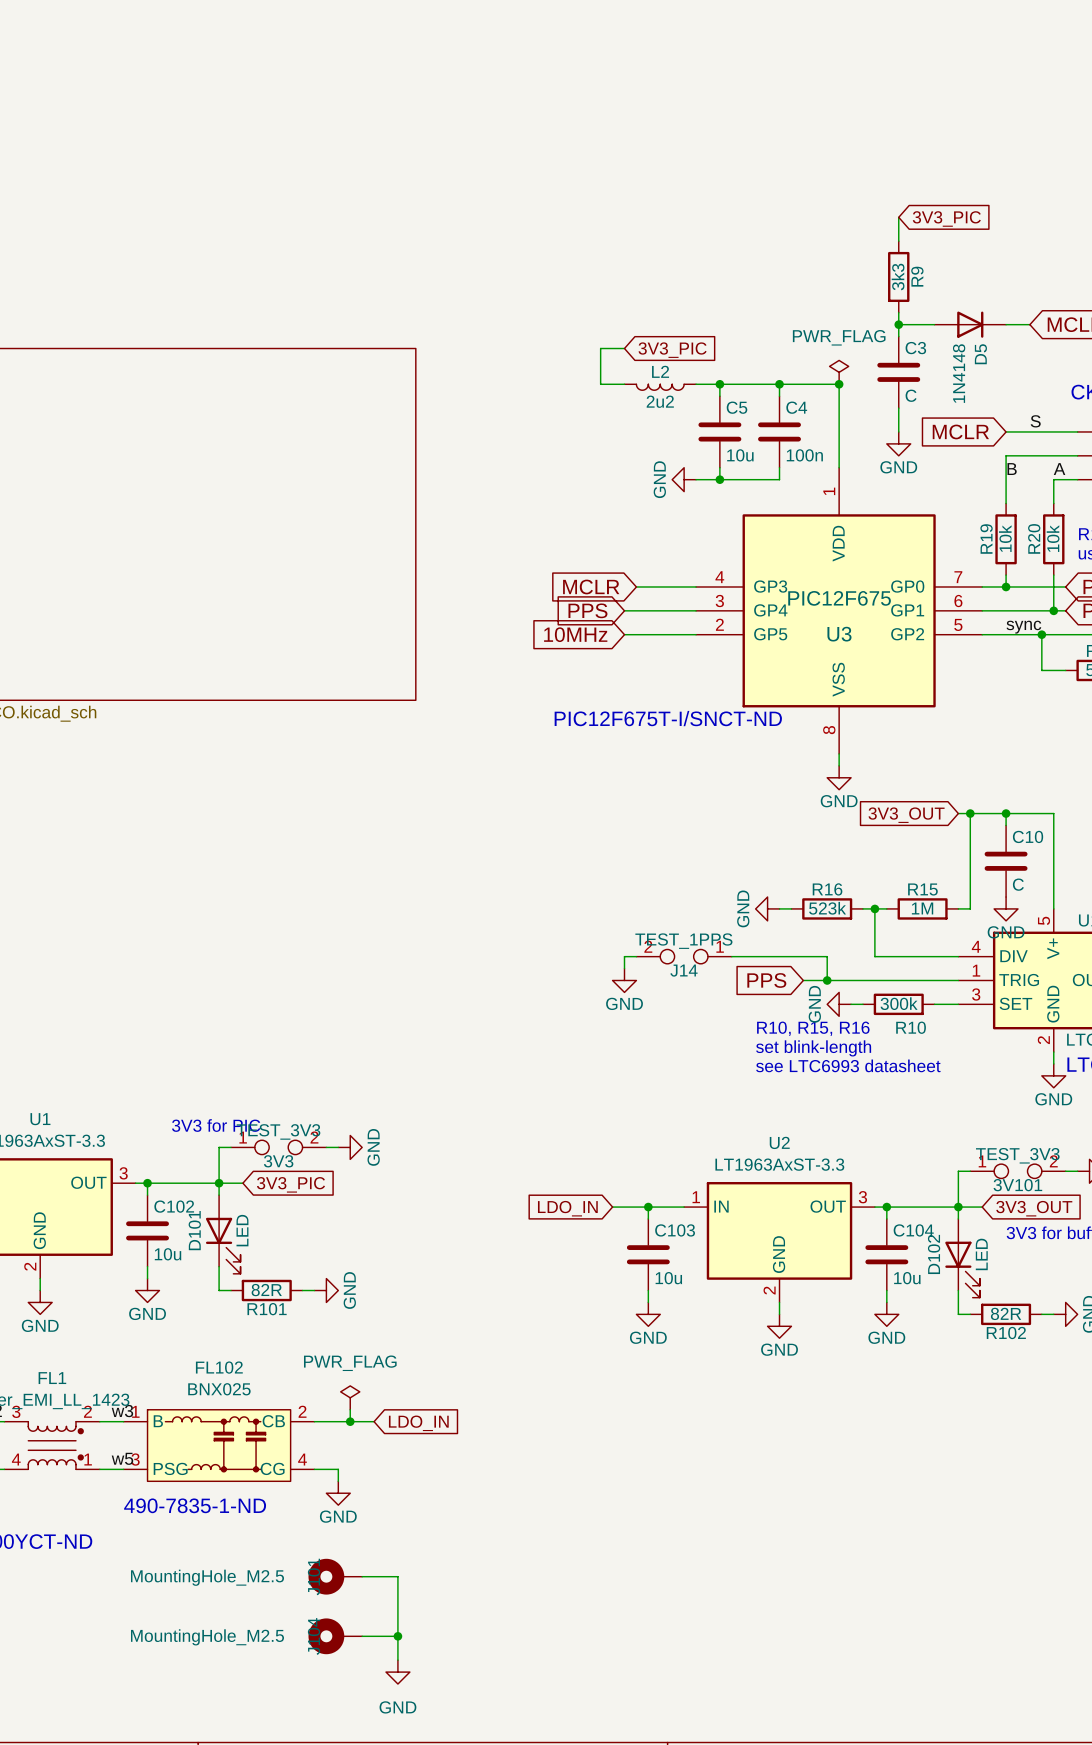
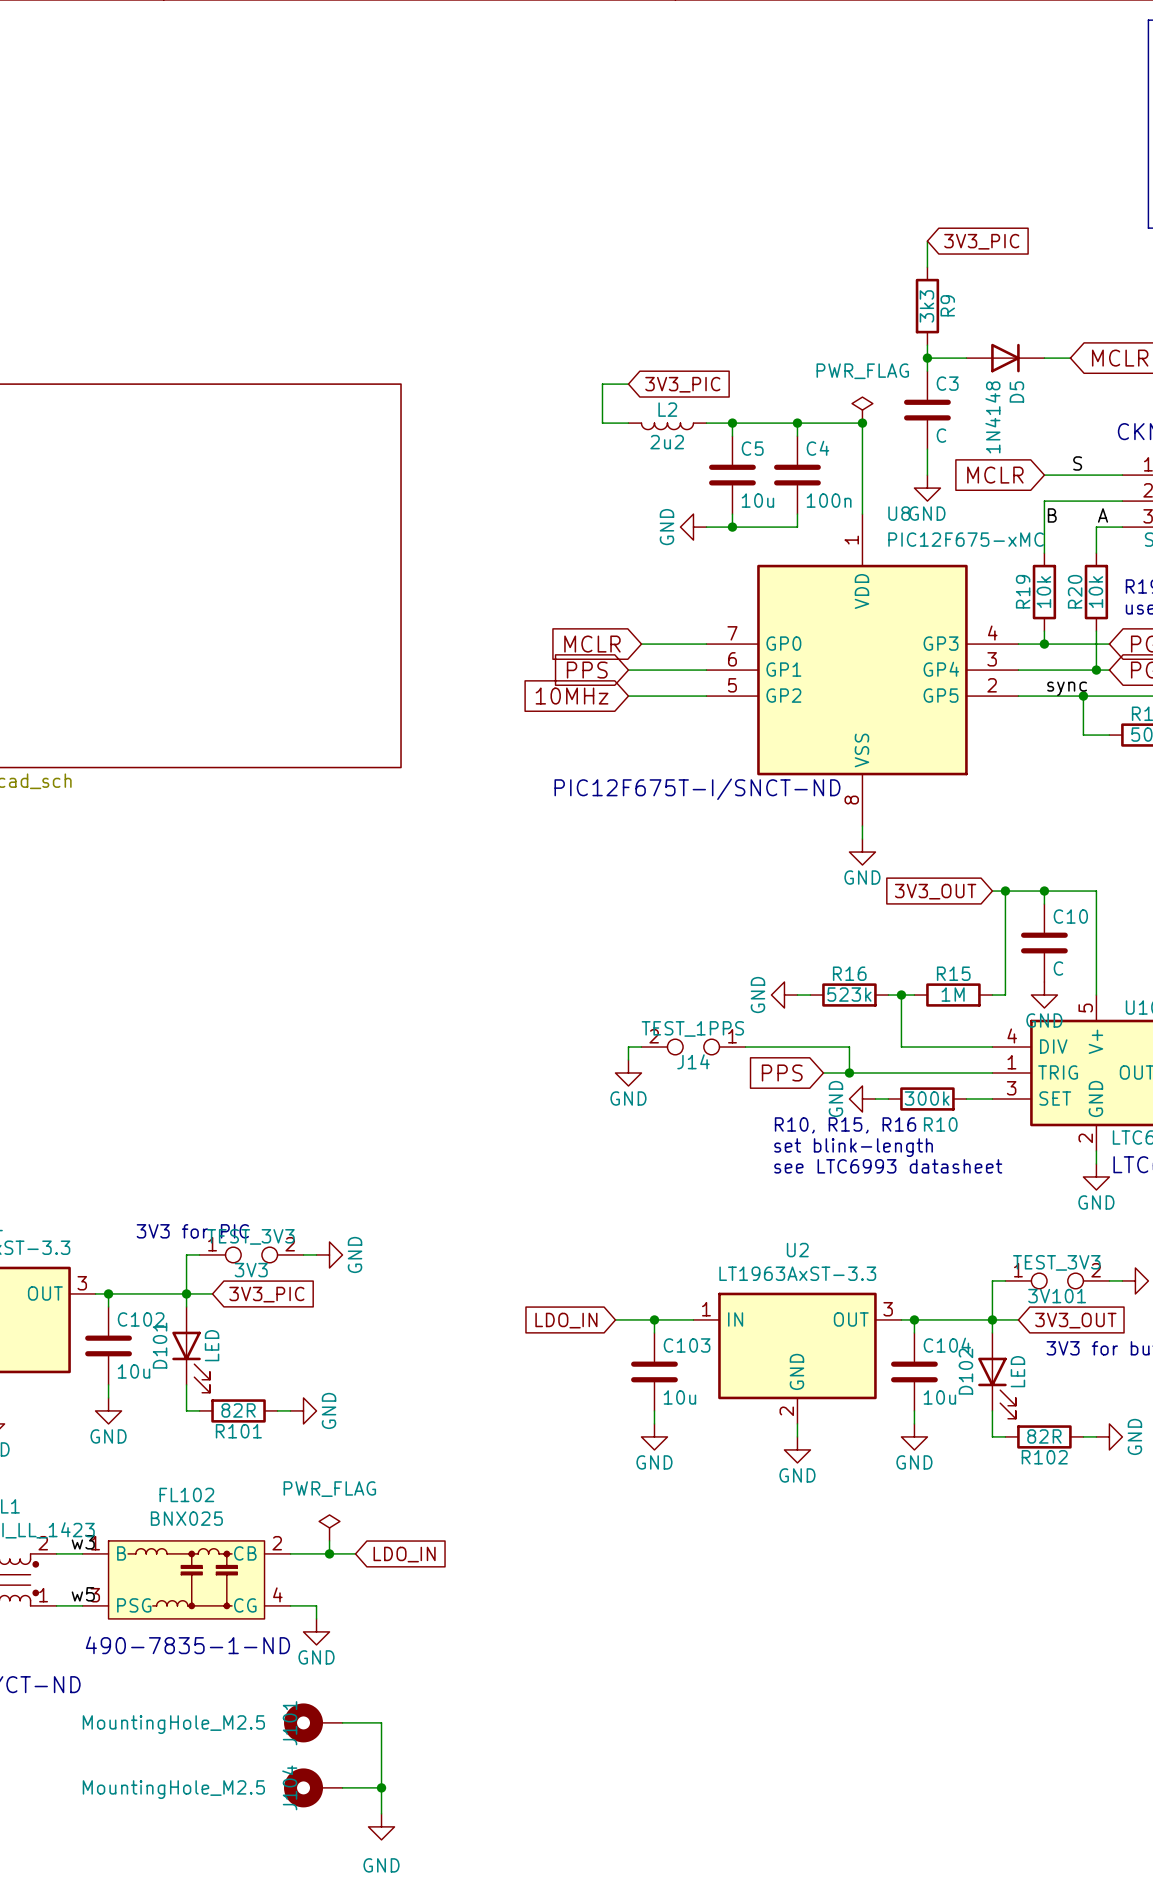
U3 value: PIC12F675 (839, 598) -> PIC12F675-xMC (966, 539)
U3 flip: as is (839, 610) -> left-right (862, 670)
U3 name: U3 (839, 634) -> U8 (899, 513)

